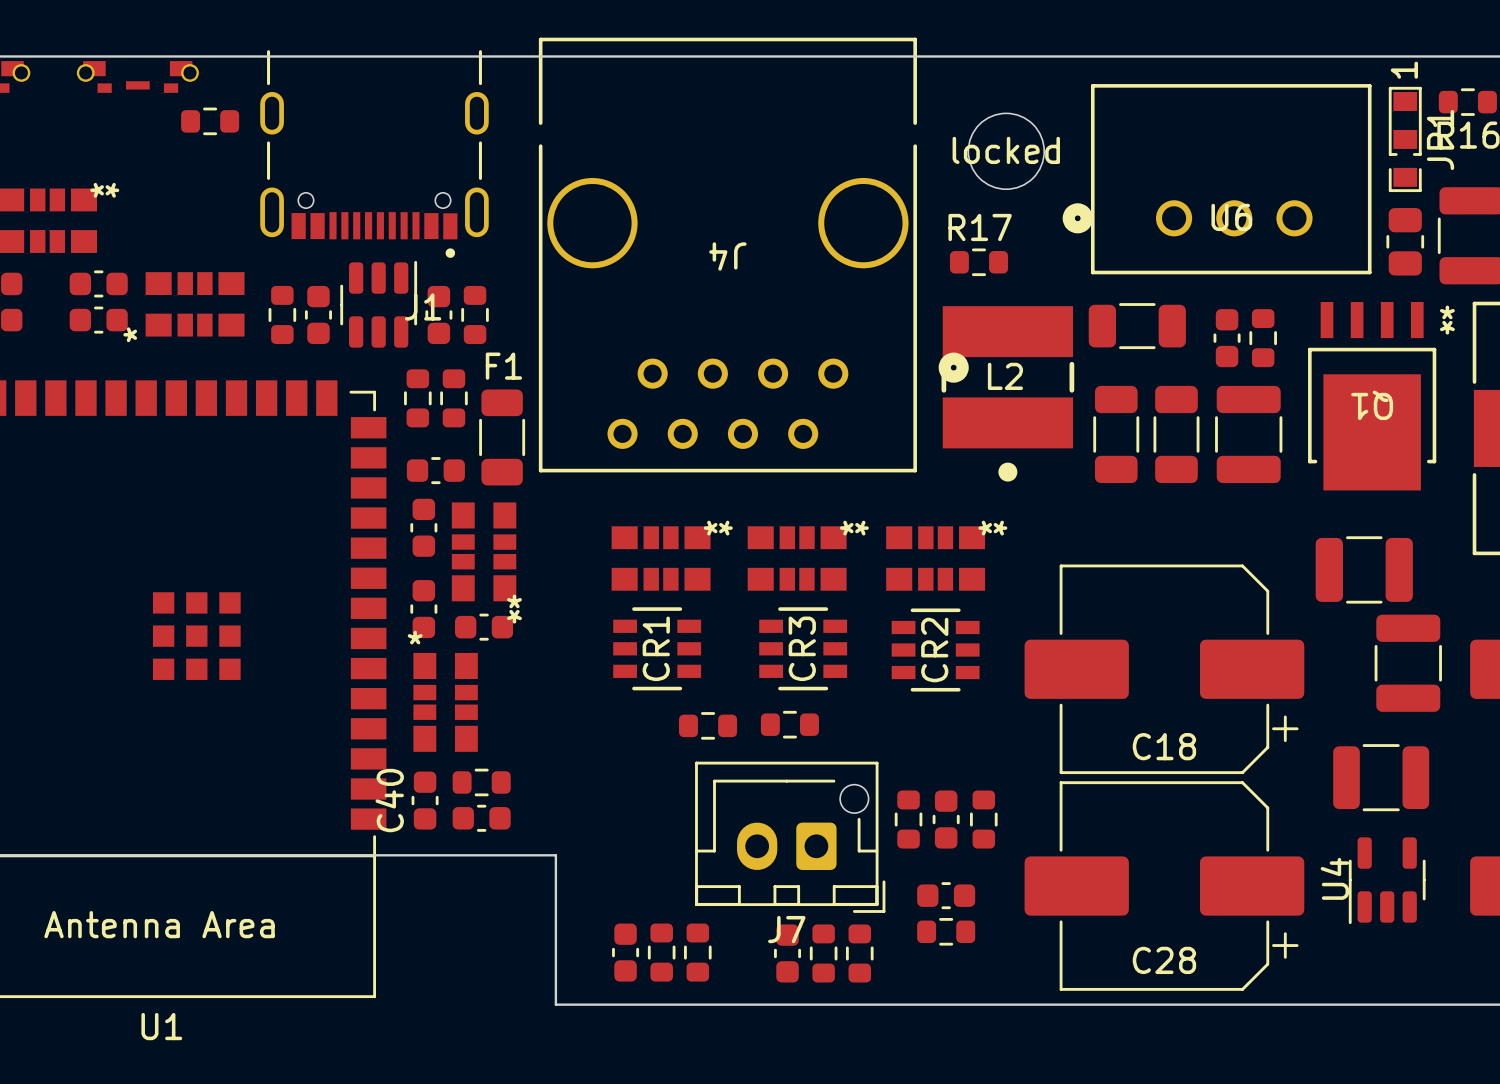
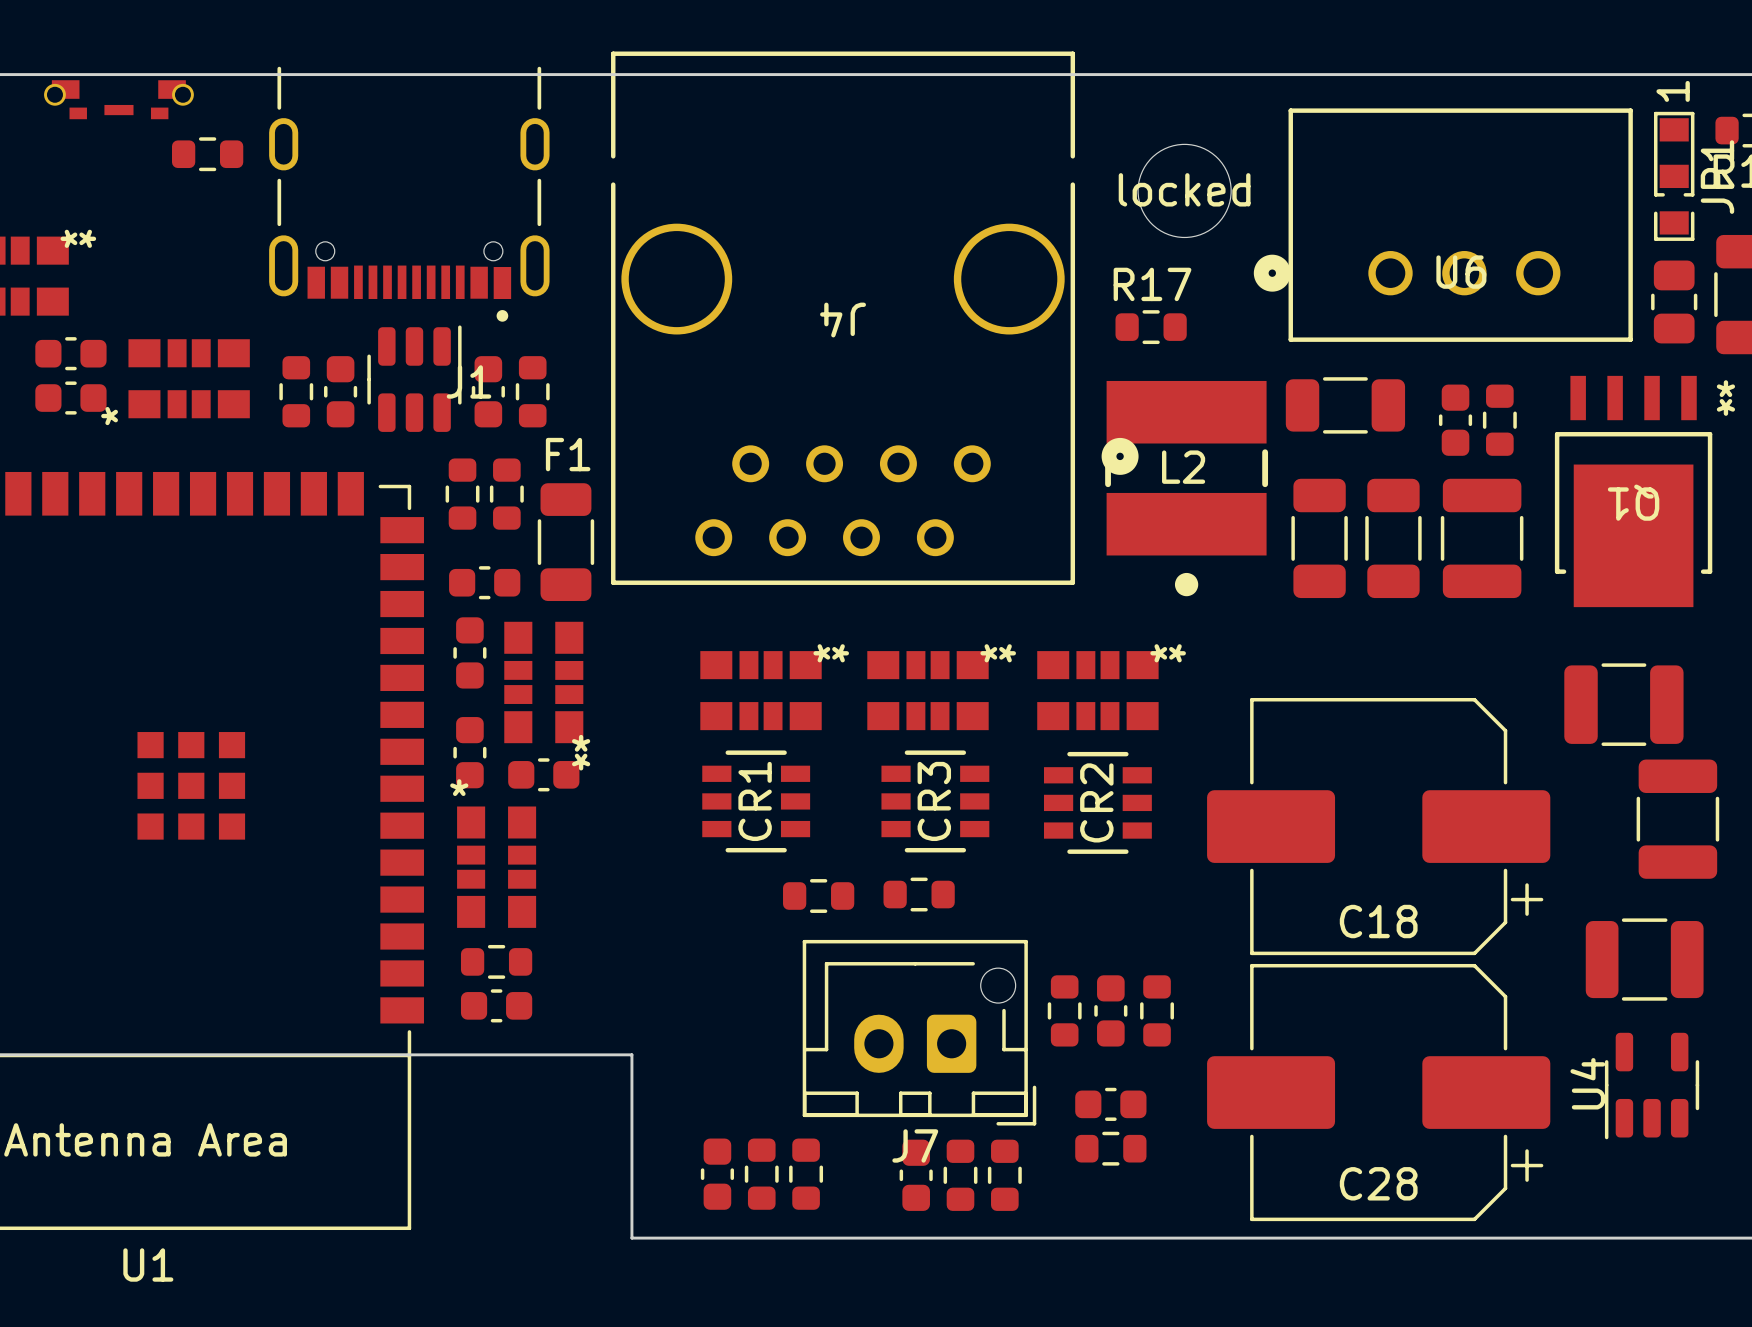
part position: (481, 782) -> (496, 961)
C40: (425, 800) -> none
part position: (481, 818) -> (496, 1005)

